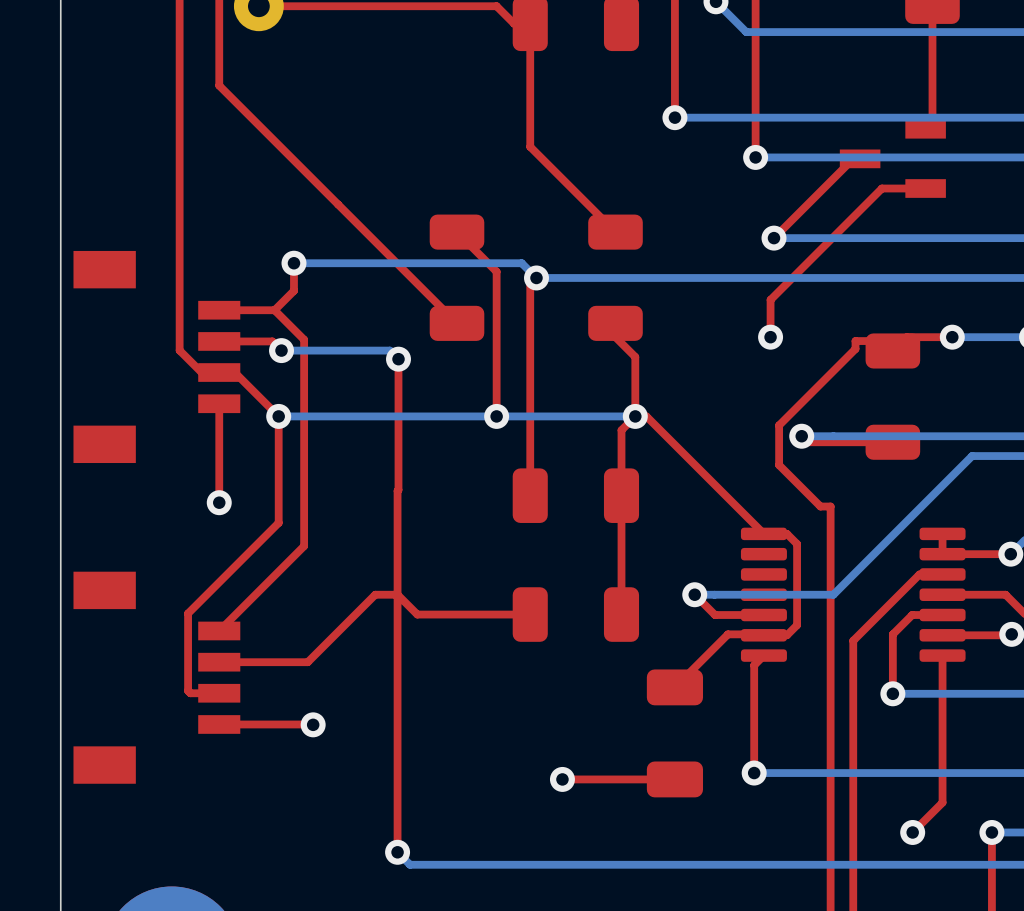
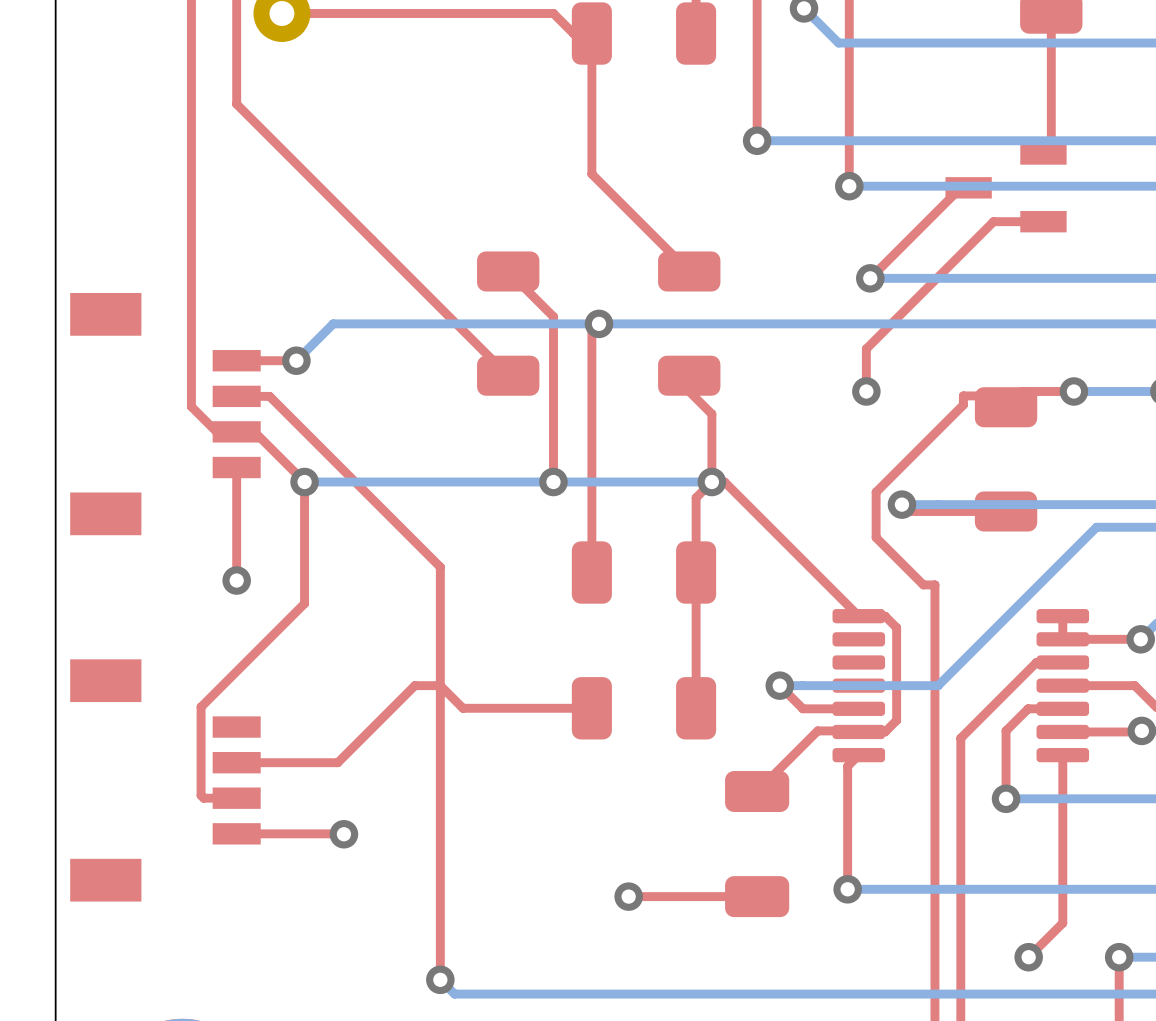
top track: (293, 263) (293, 290) (274, 310) (304, 339) (304, 546) (219, 630) -> none
bottom track: (293, 263) (521, 263) (536, 277) -> (296, 360) (333, 323) (599, 323)
via: (293, 263) -> none
via: none -> (296, 360)
top track: (248, 341) (272, 341) (281, 350) -> none
bottom track: (281, 350) (389, 350) (398, 359) -> none
via: (281, 350) -> none
top track: (398, 359) (397, 490) -> (269, 396) (440, 567)
via: (398, 359) -> none

